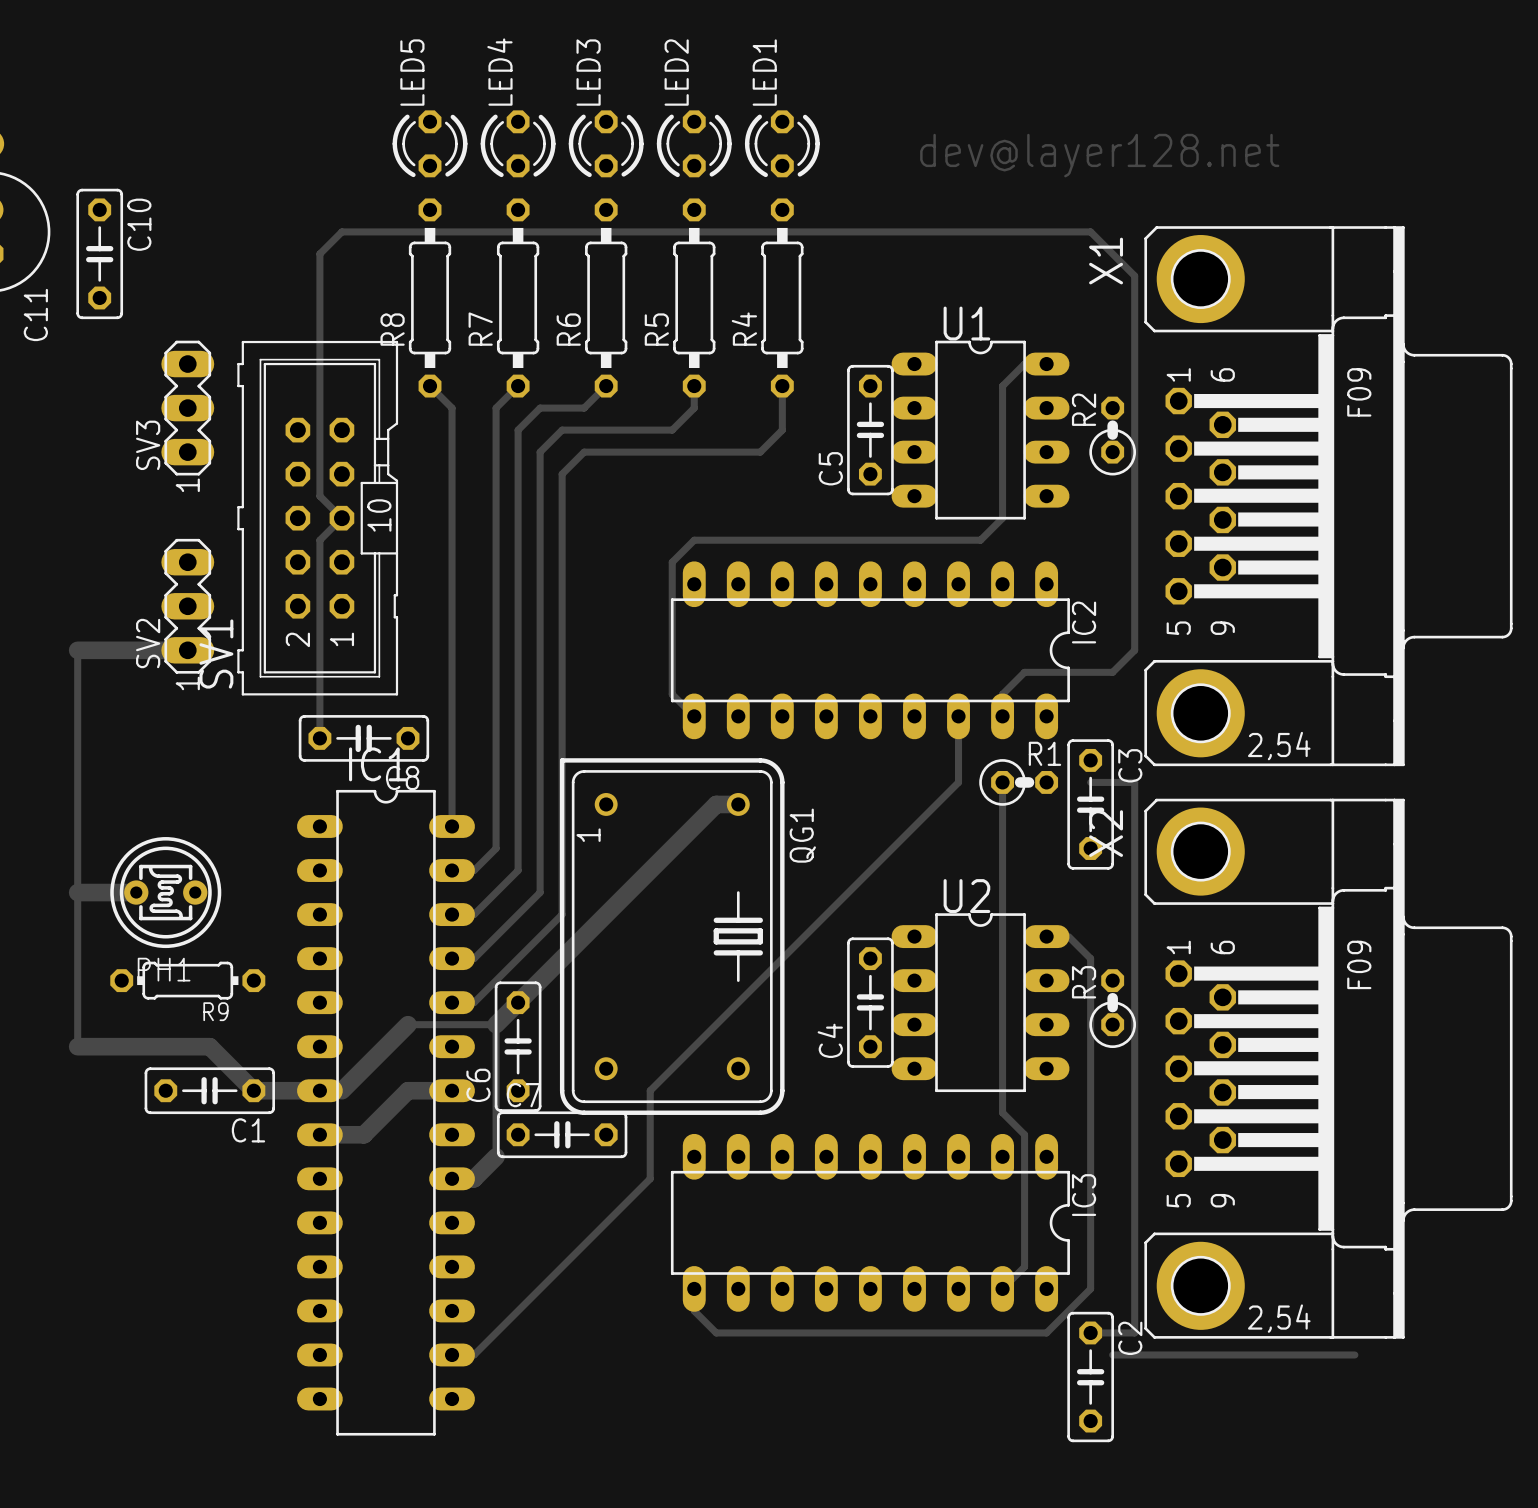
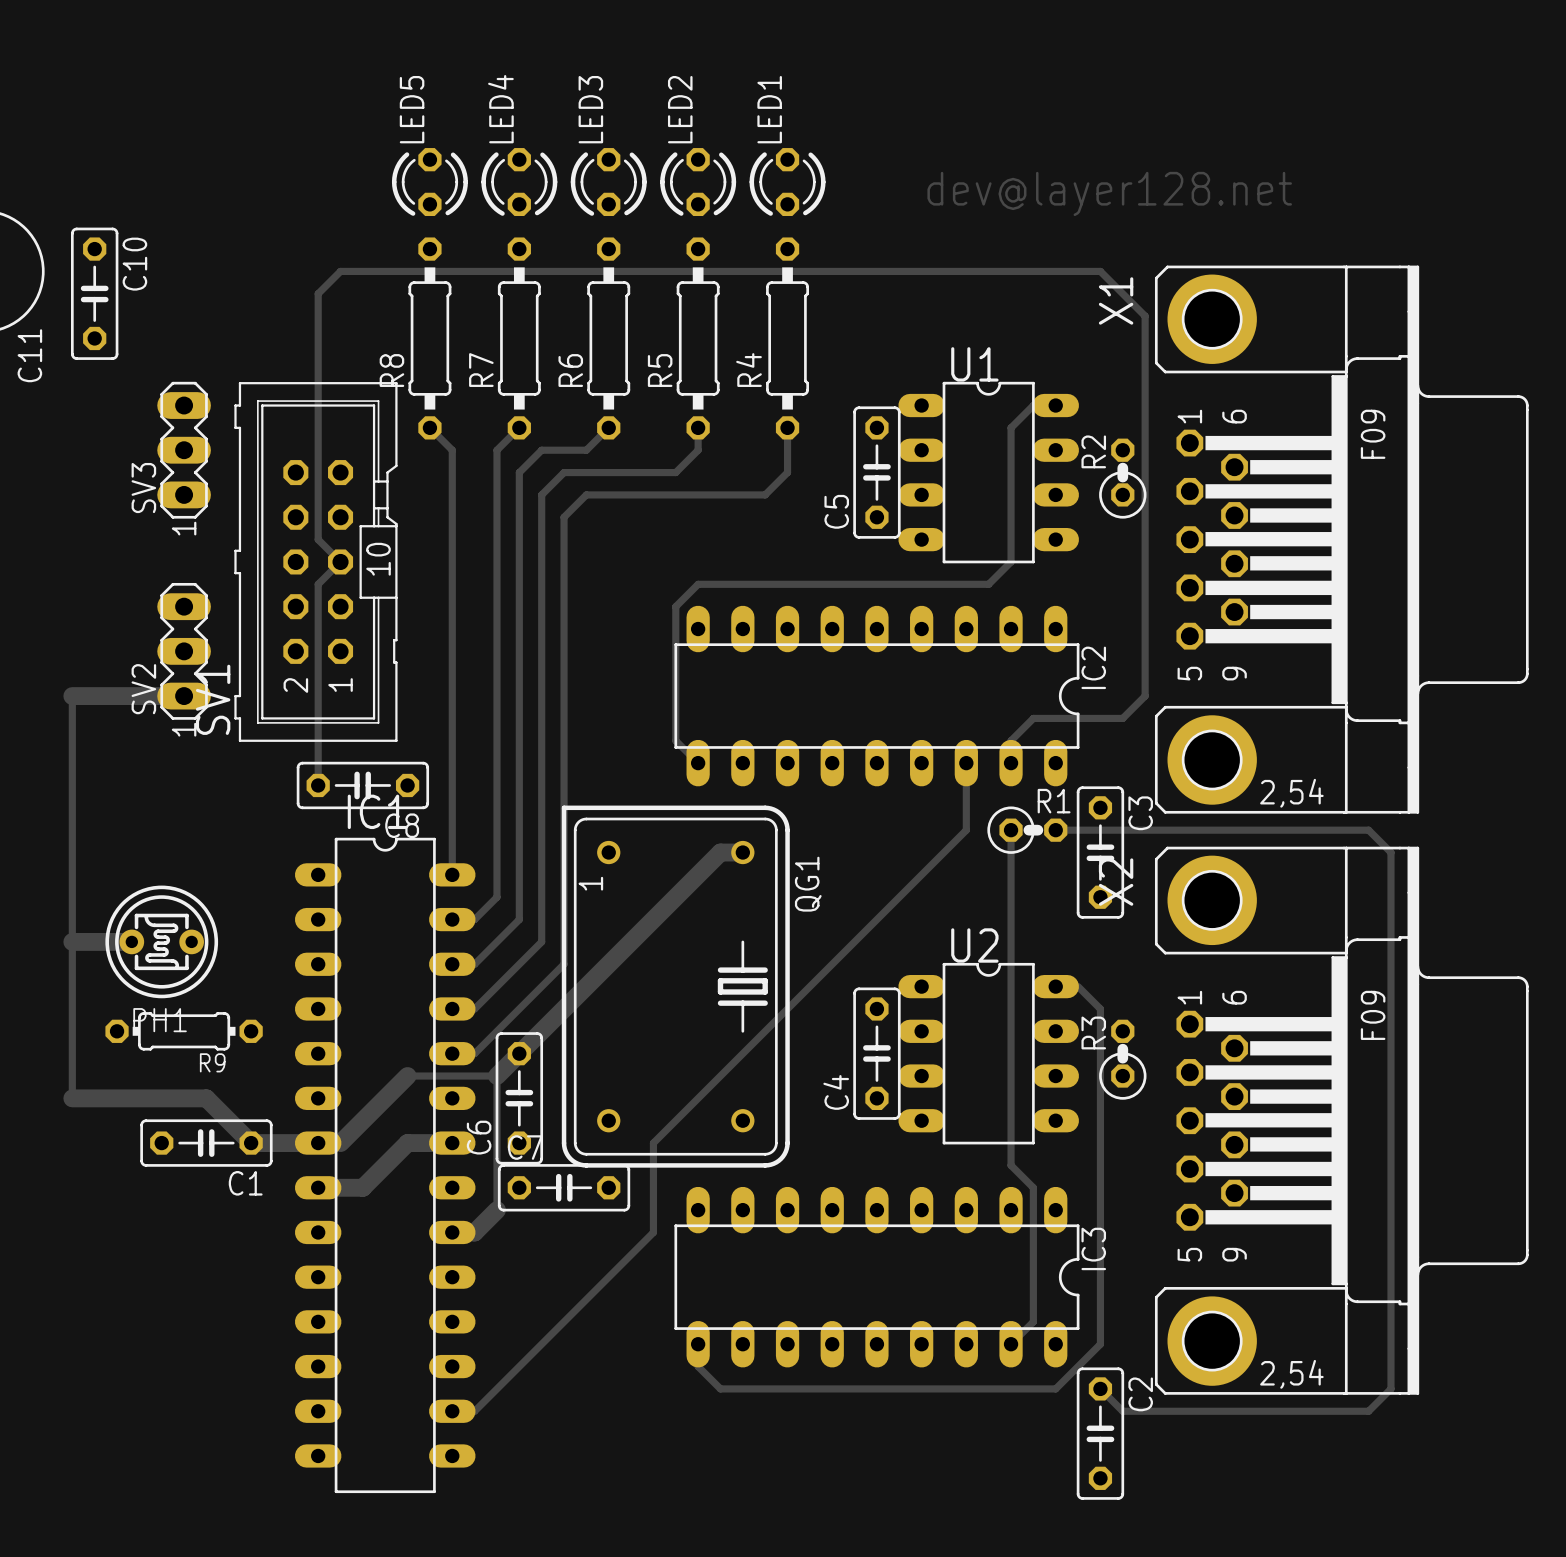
track: none -> (1055, 830) (1100, 830)
track: (1134, 782) (1134, 1332) (1090, 1332) -> (1145, 830) (1368, 830) (1390, 852) (1390, 1388) (1368, 1411)
track: none -> (1100, 1388) (1122, 1411)

